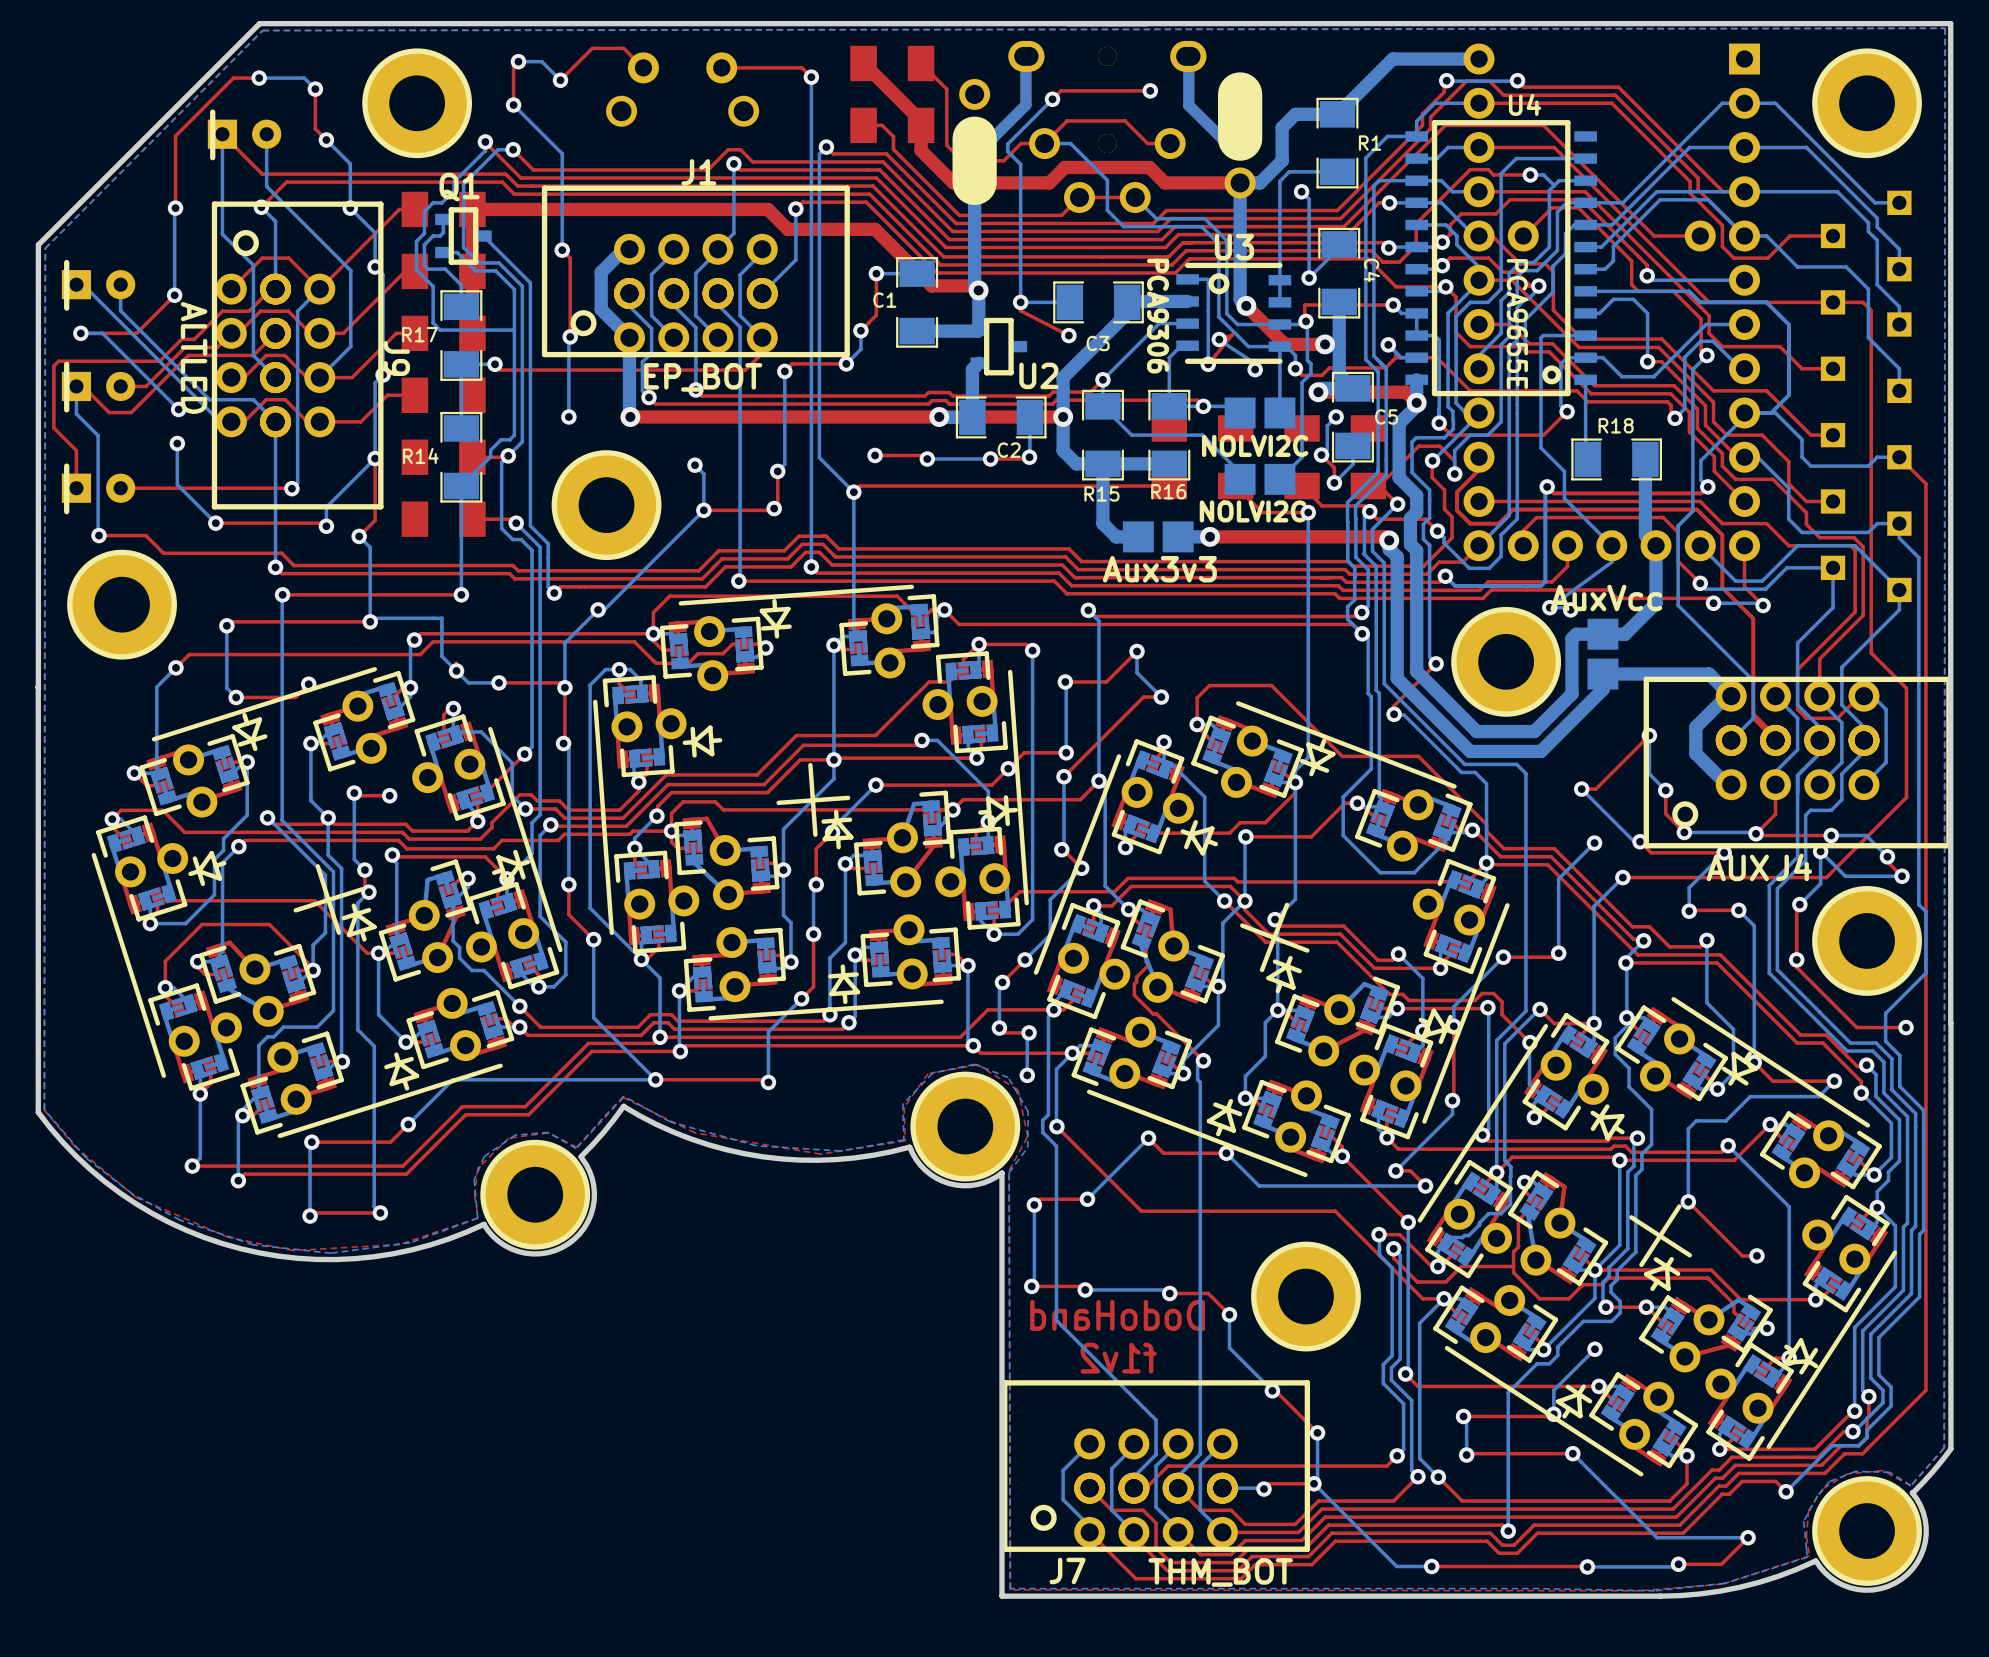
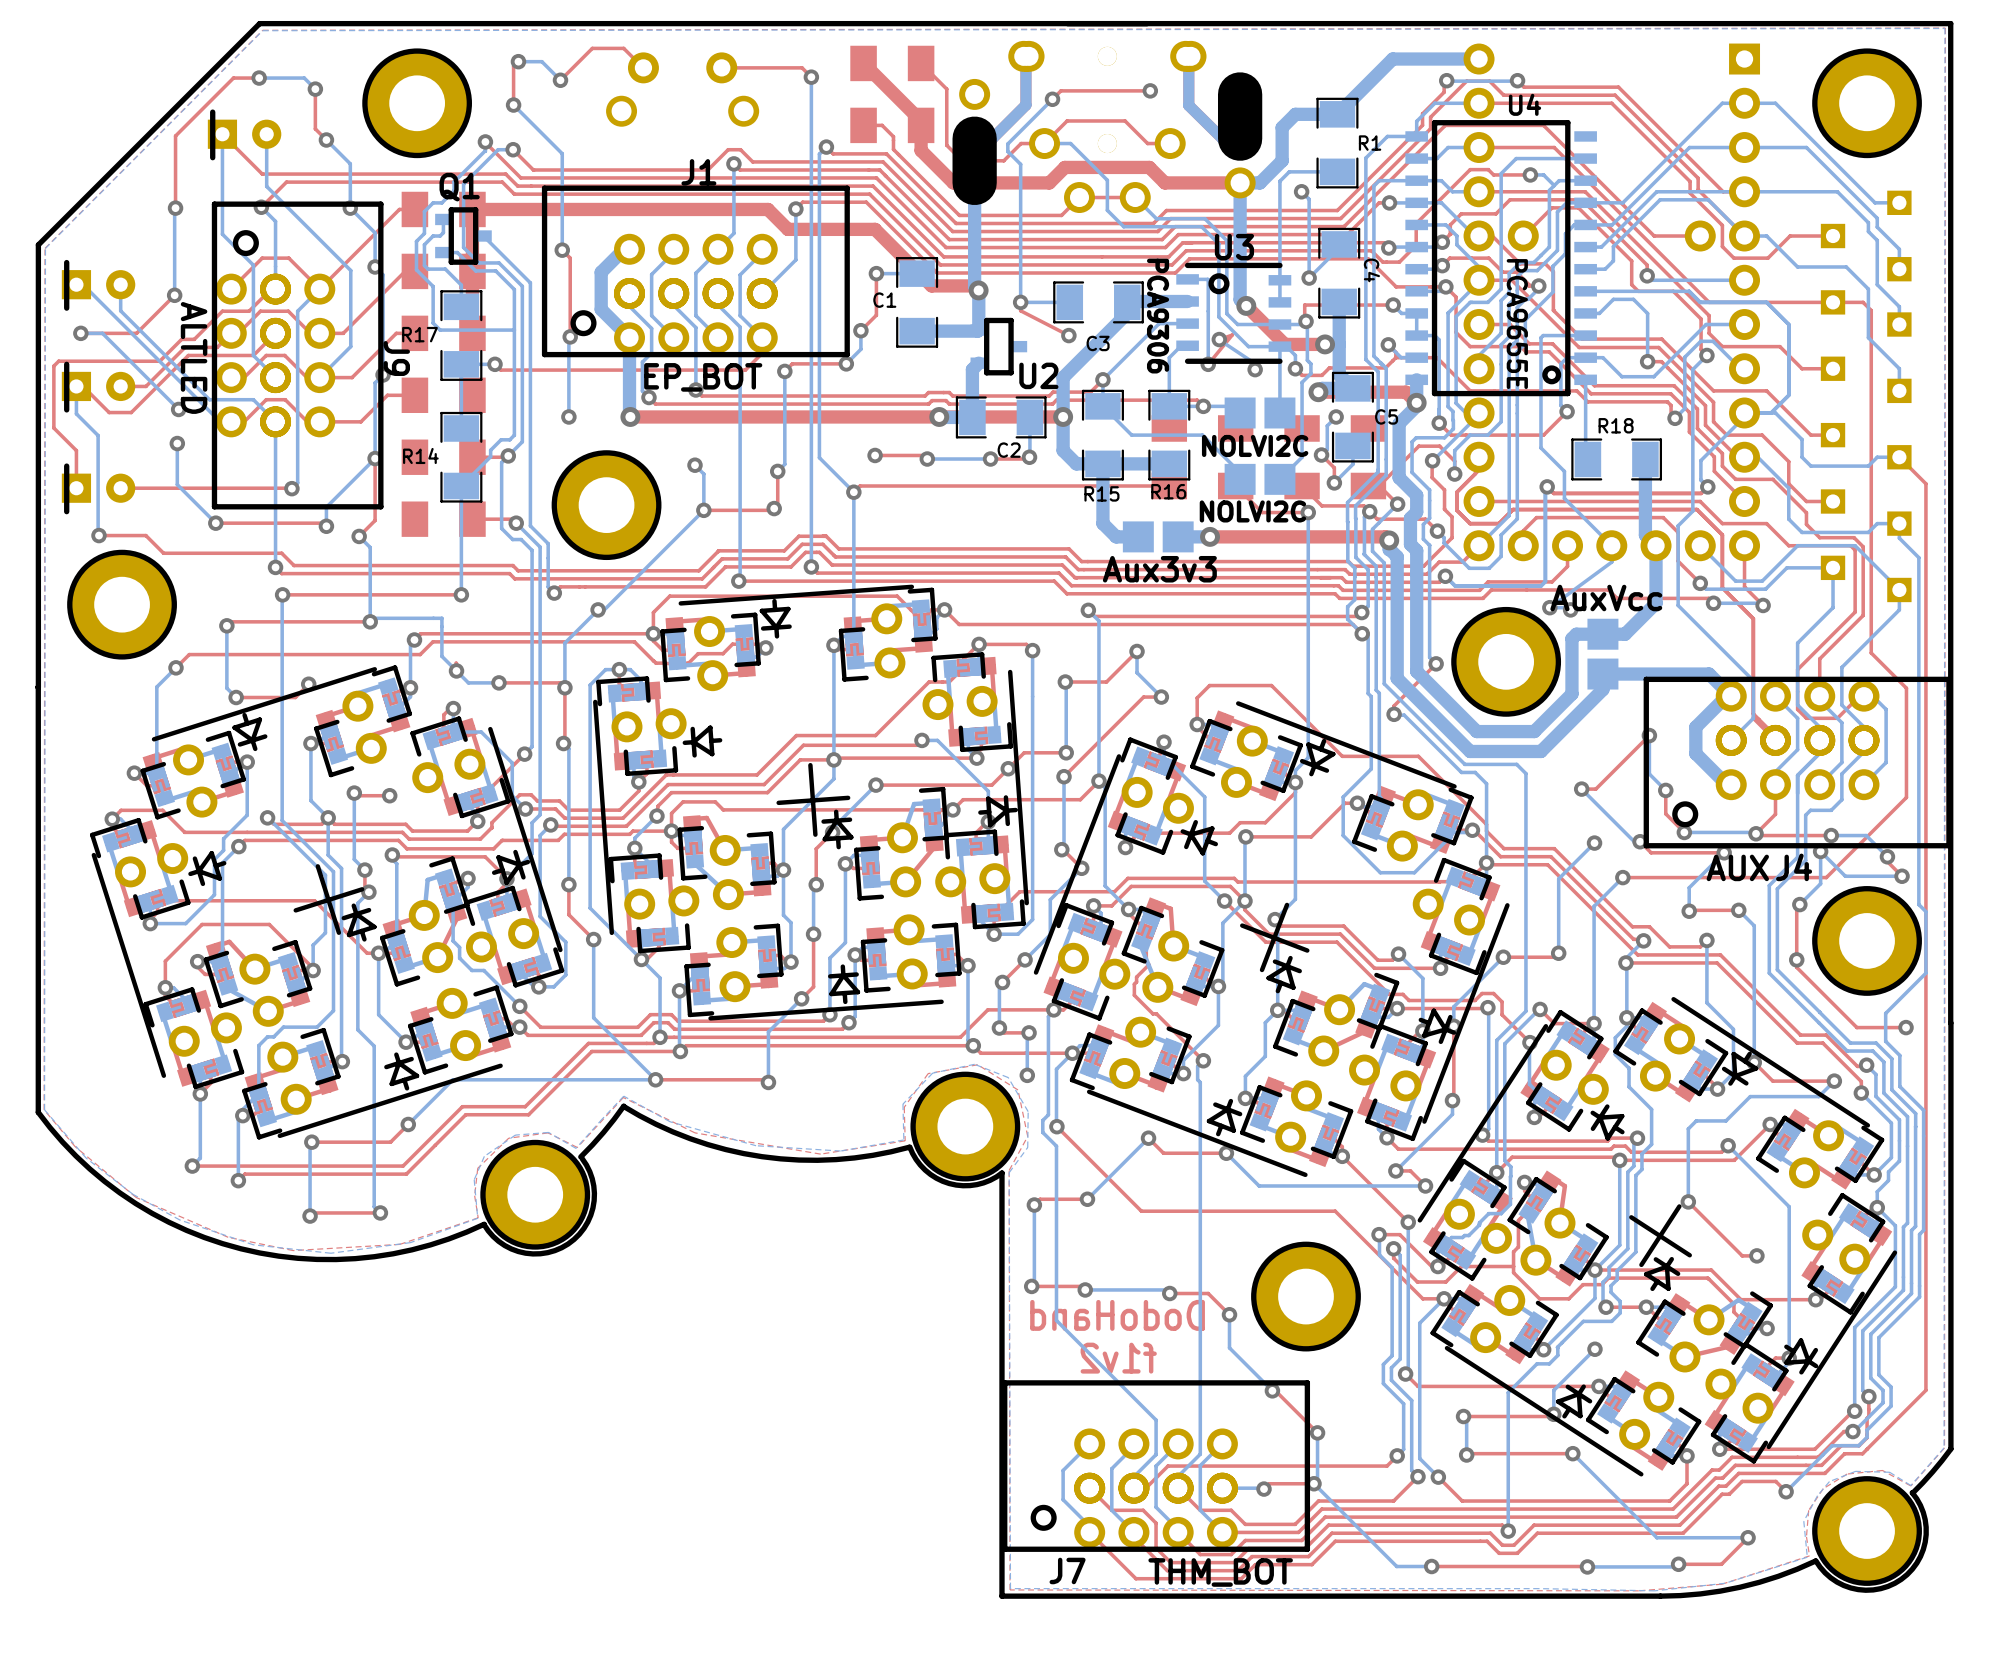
part footprint: [593, 584, 1029, 1021] -> [593, 584, 1029, 1021]
part footprint: [91, 667, 563, 1139] -> [90, 665, 565, 1140]
part footprint: [1033, 701, 1510, 1178] -> [1033, 701, 1510, 1178]
part footprint: [1417, 997, 1898, 1477] -> [1417, 997, 1898, 1477]

